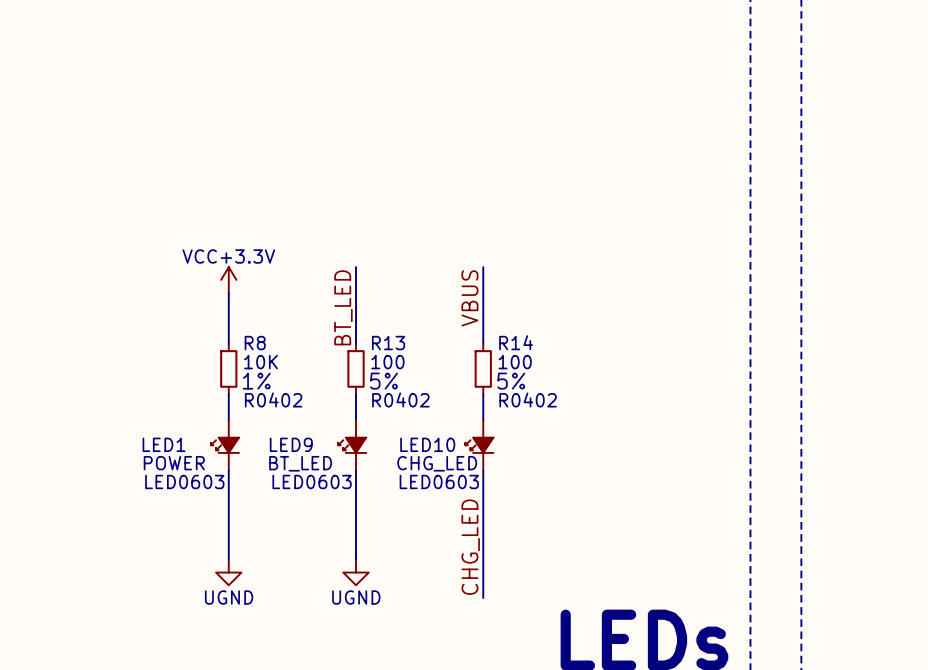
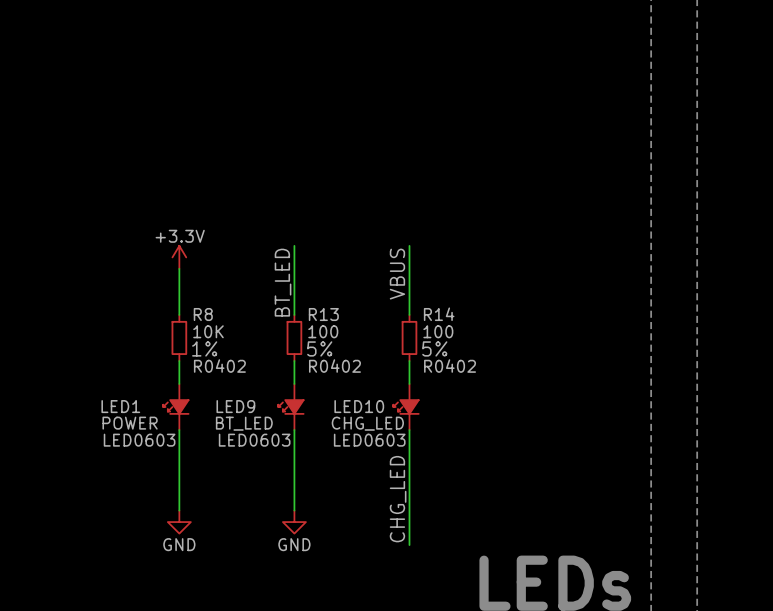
power symbol: VCC+3.3V (228, 279) -> +3.3V (179, 257)
power symbol: UGND (228, 572) -> GND (179, 522)
power symbol: UGND (356, 572) -> GND (294, 522)

